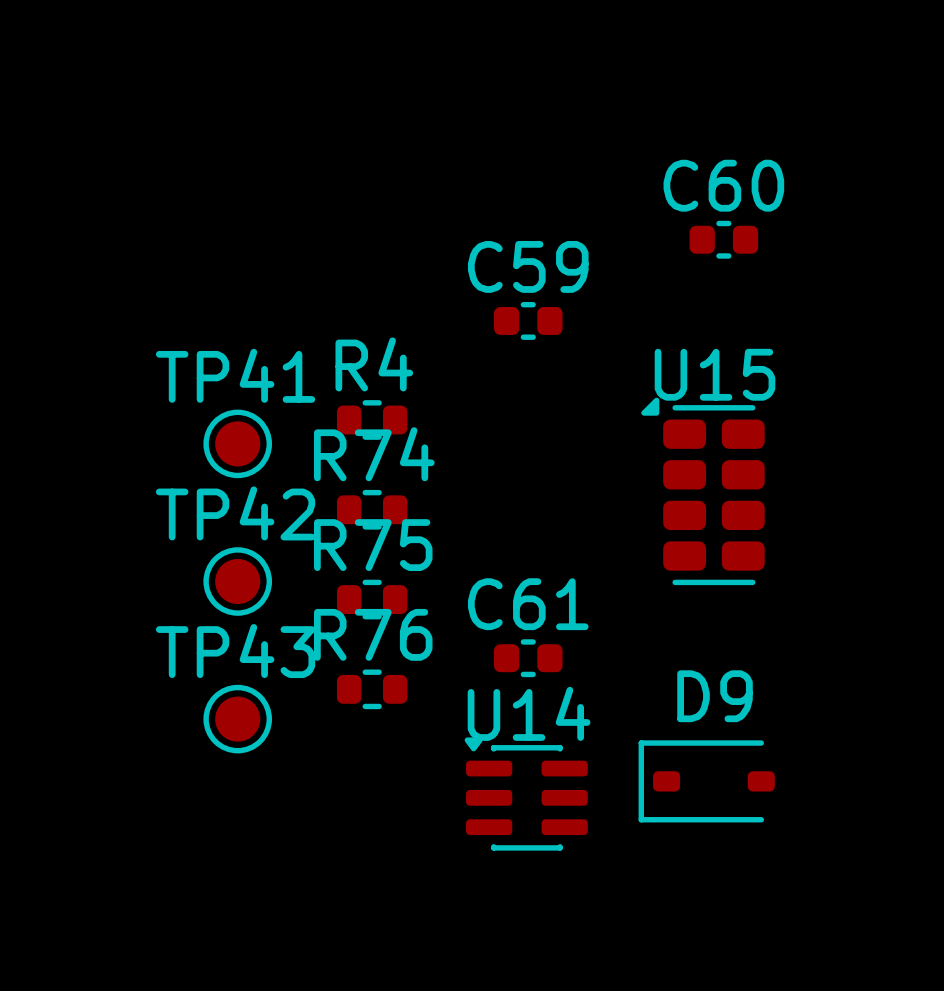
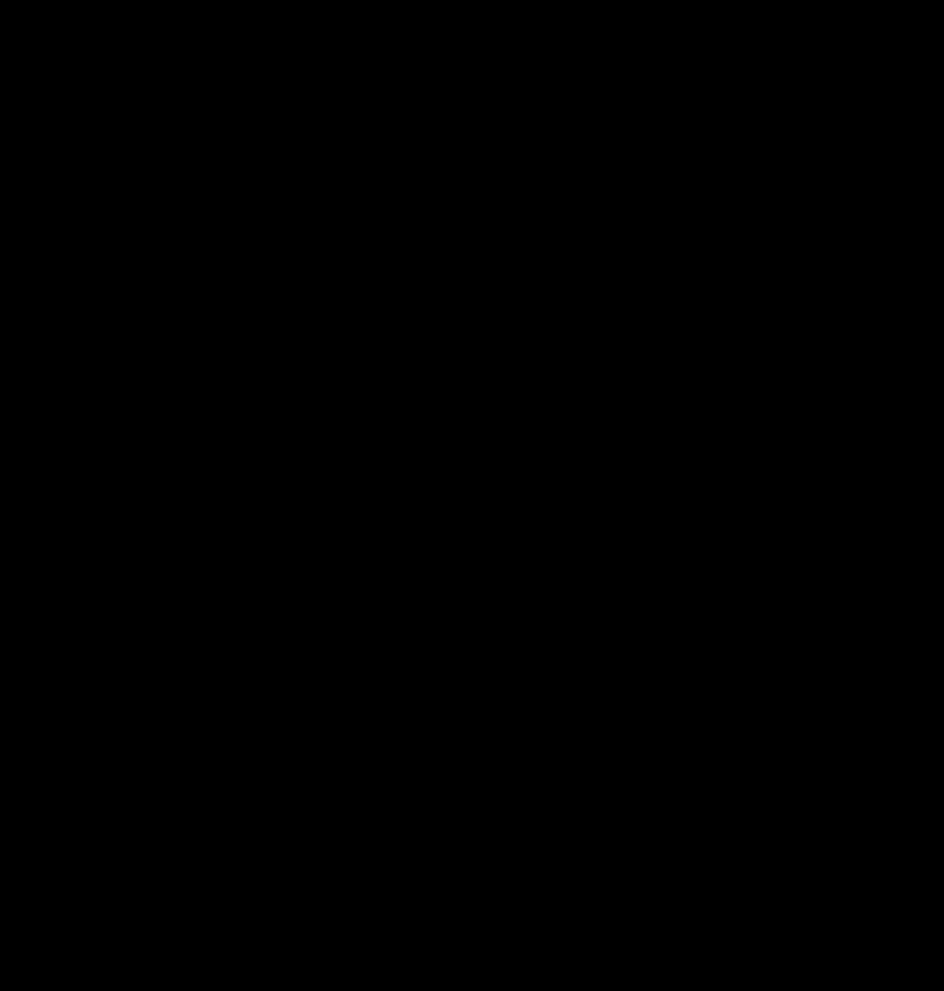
C60: (723, 239) -> none
C59: (528, 320) -> none
R4: (372, 419) -> none
TP41: (237, 443) -> none
U15: (702, 491) -> none
R74: (372, 509) -> none
TP42: (237, 581) -> none
R75: (372, 599) -> none
C61: (528, 658) -> none
R76: (372, 689) -> none
TP43: (237, 719) -> none
D9: (706, 781) -> none
U14: (526, 794) -> none

